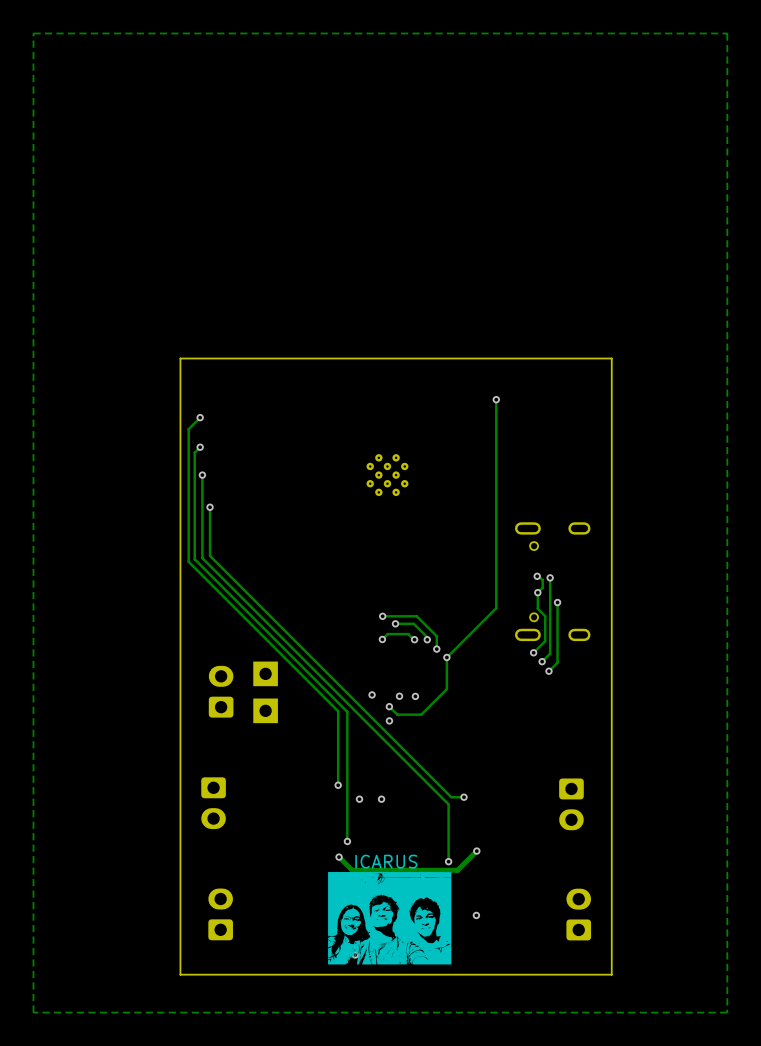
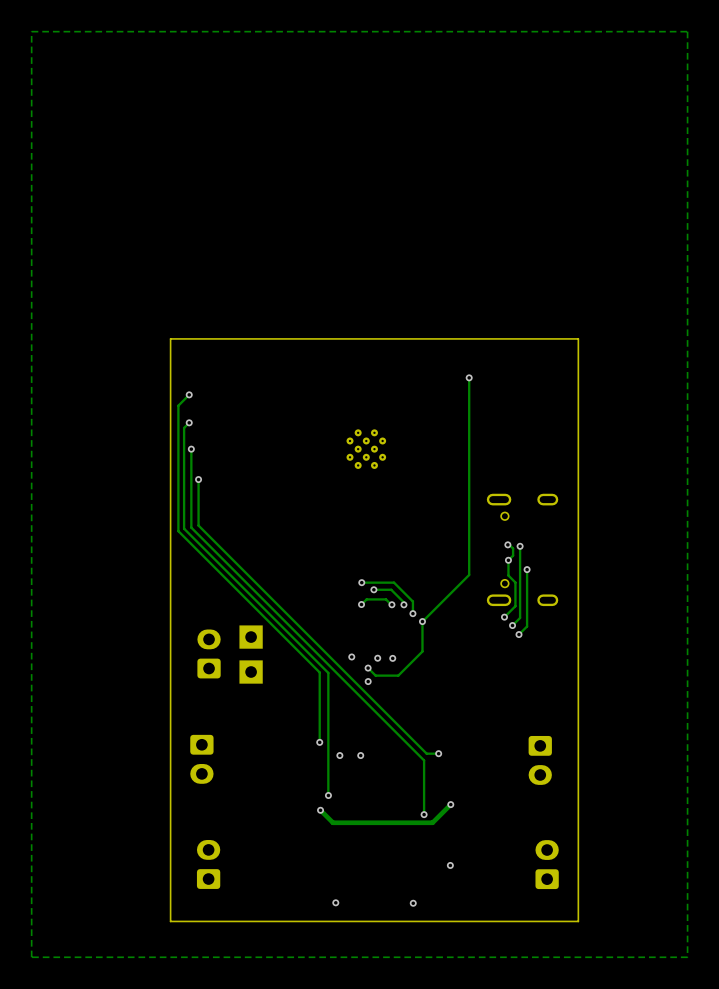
text: ICARUS (386, 861) -> none
drawing: [328, 872, 452, 965] -> none

